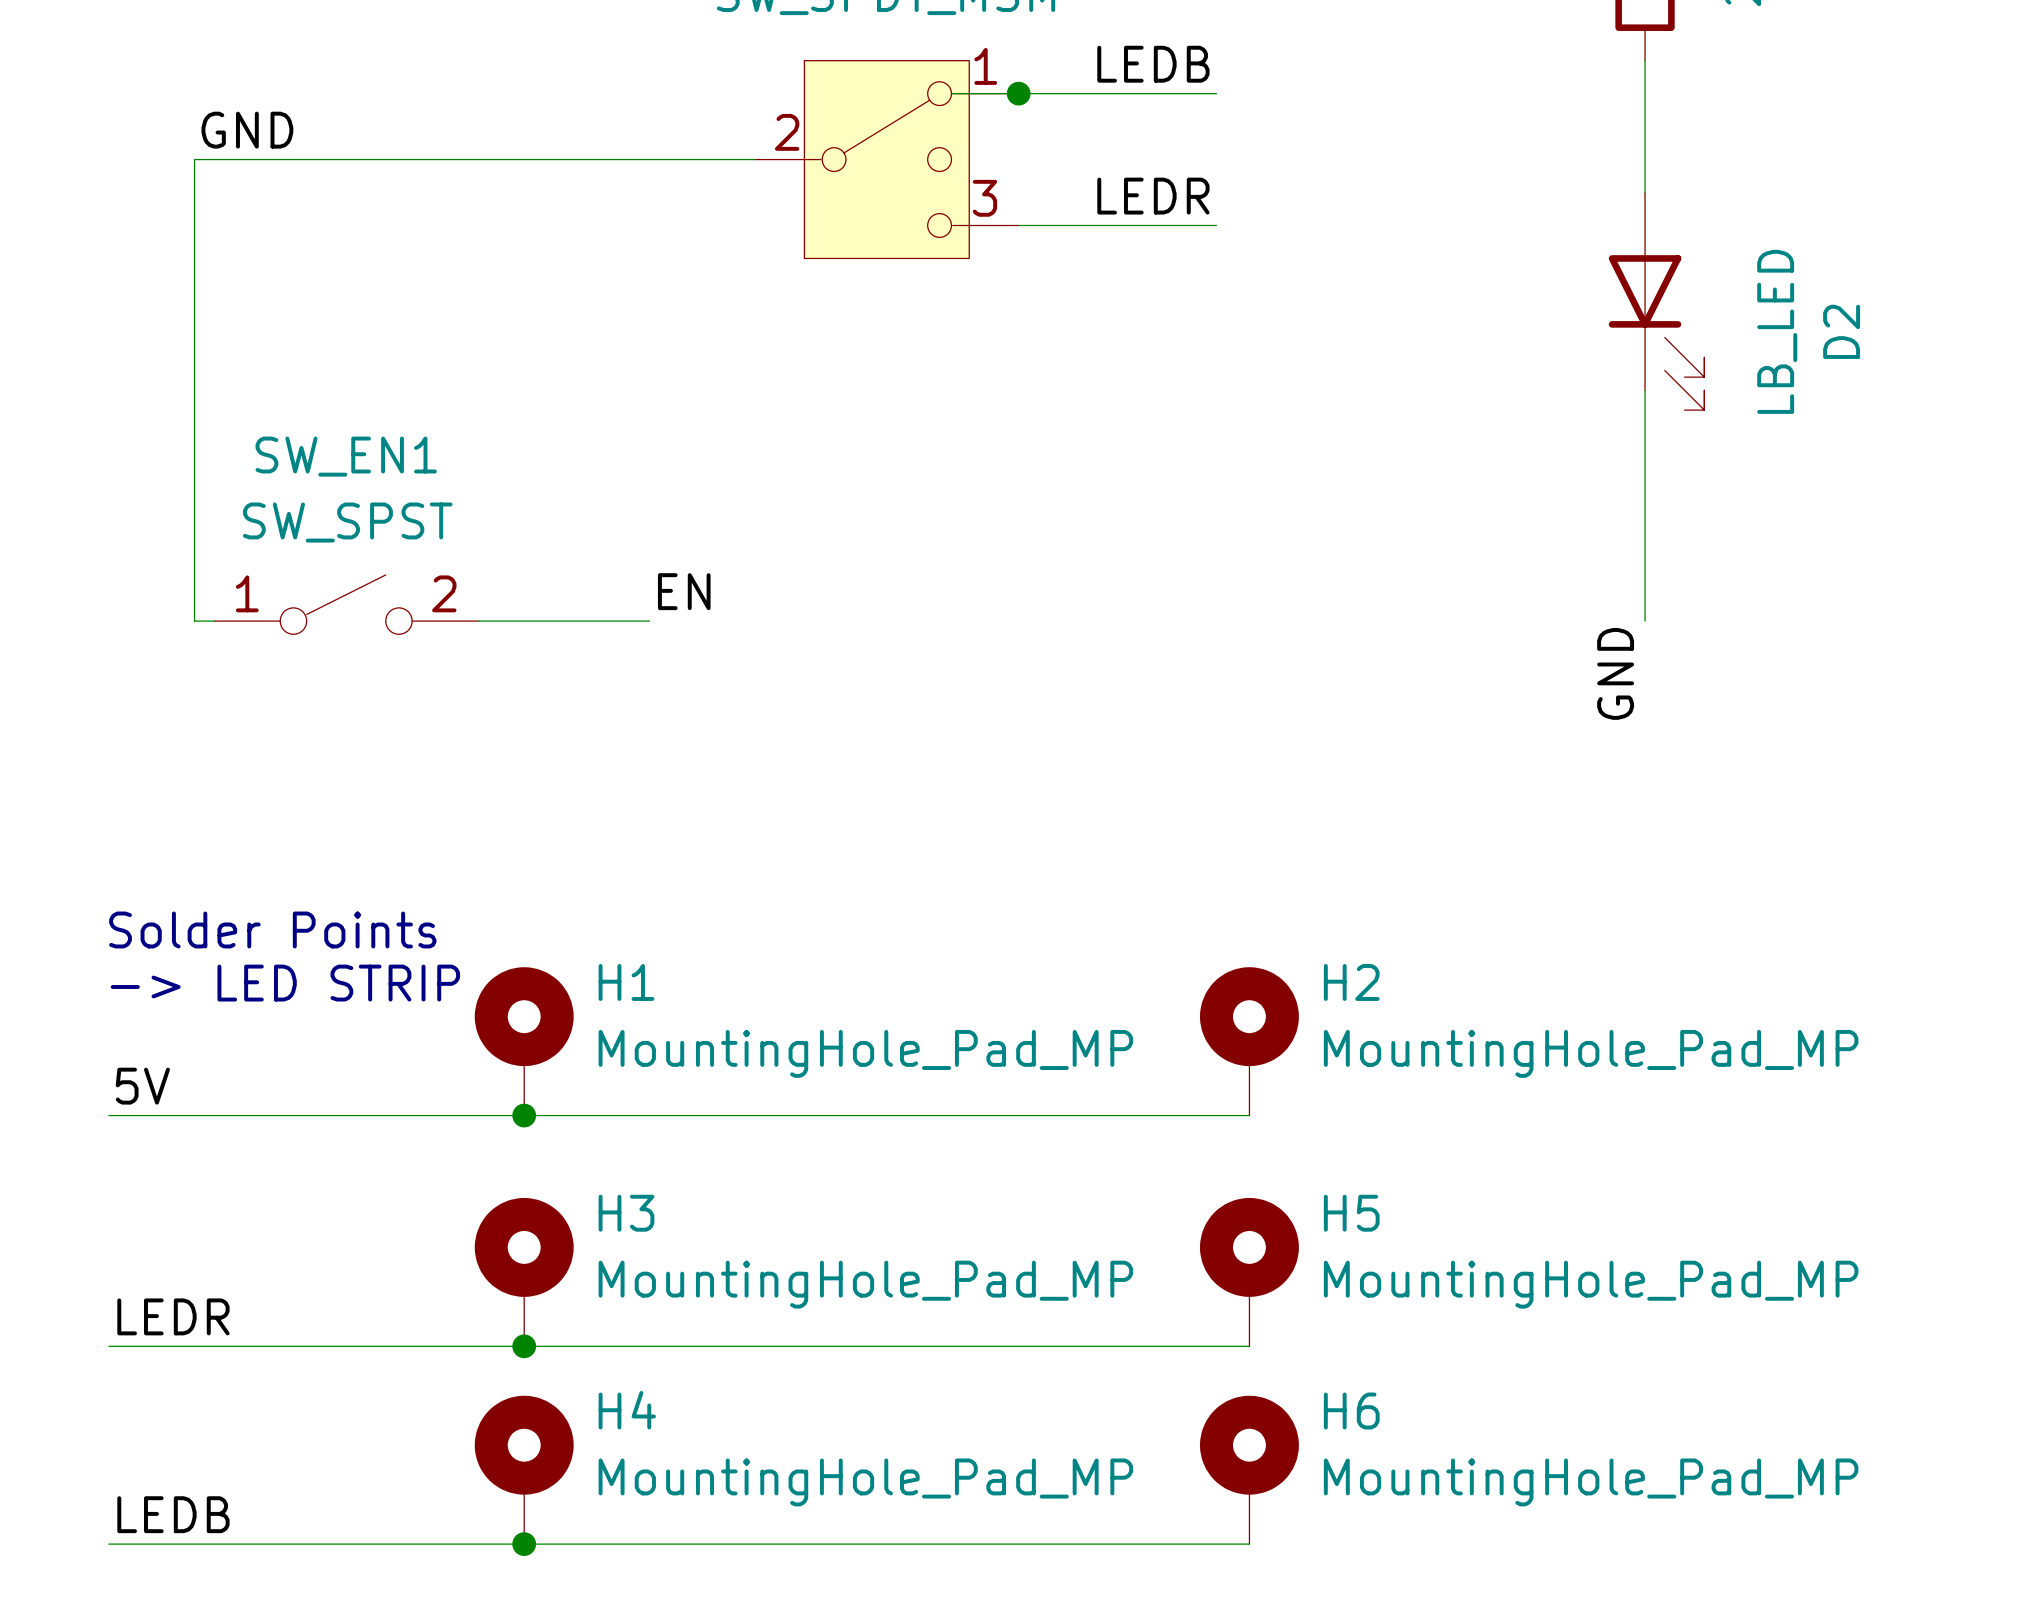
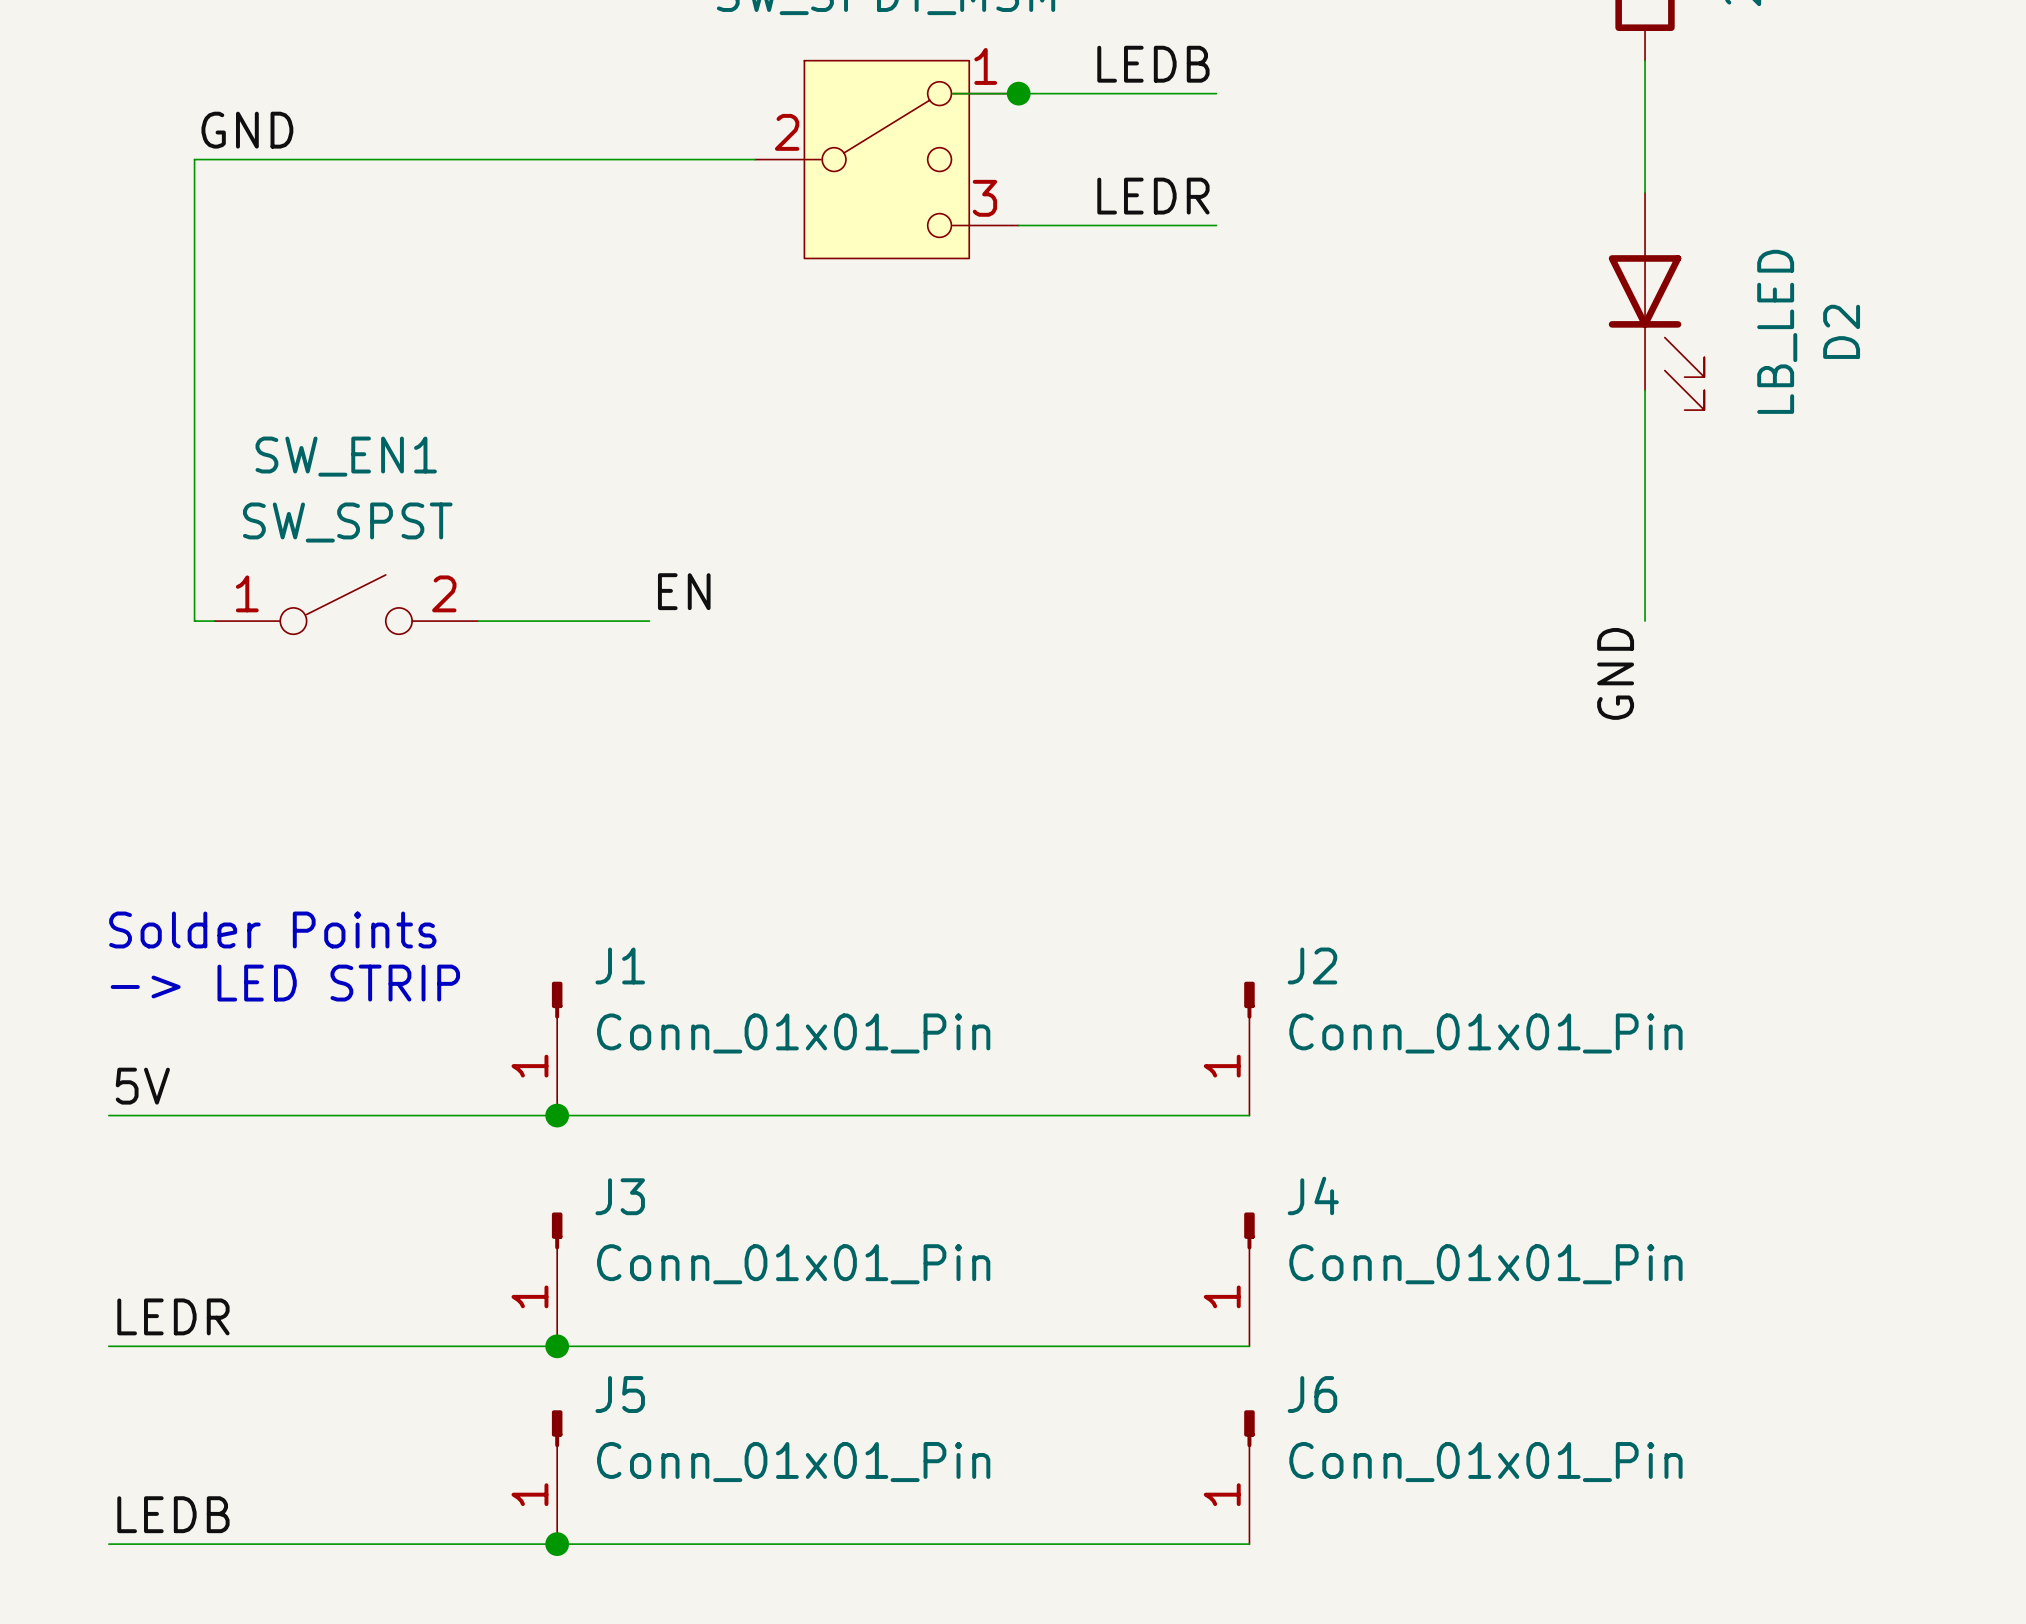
H1: MountingHole_Pad_MP (524, 1041) -> none
H2: MountingHole_Pad_MP (1249, 1041) -> none
J1: none -> Conn_01x01_Pin (557, 1048)
J2: none -> Conn_01x01_Pin (1249, 1048)
junction position: (524, 1115) -> (557, 1115)
H3: MountingHole_Pad_MP (524, 1272) -> none
H5: MountingHole_Pad_MP (1249, 1272) -> none
J3: none -> Conn_01x01_Pin (557, 1279)
J4: none -> Conn_01x01_Pin (1249, 1279)
junction position: (524, 1346) -> (557, 1346)
H4: MountingHole_Pad_MP (524, 1469) -> none
H6: MountingHole_Pad_MP (1249, 1469) -> none
J5: none -> Conn_01x01_Pin (557, 1477)
J6: none -> Conn_01x01_Pin (1249, 1477)
junction position: (524, 1544) -> (557, 1544)

